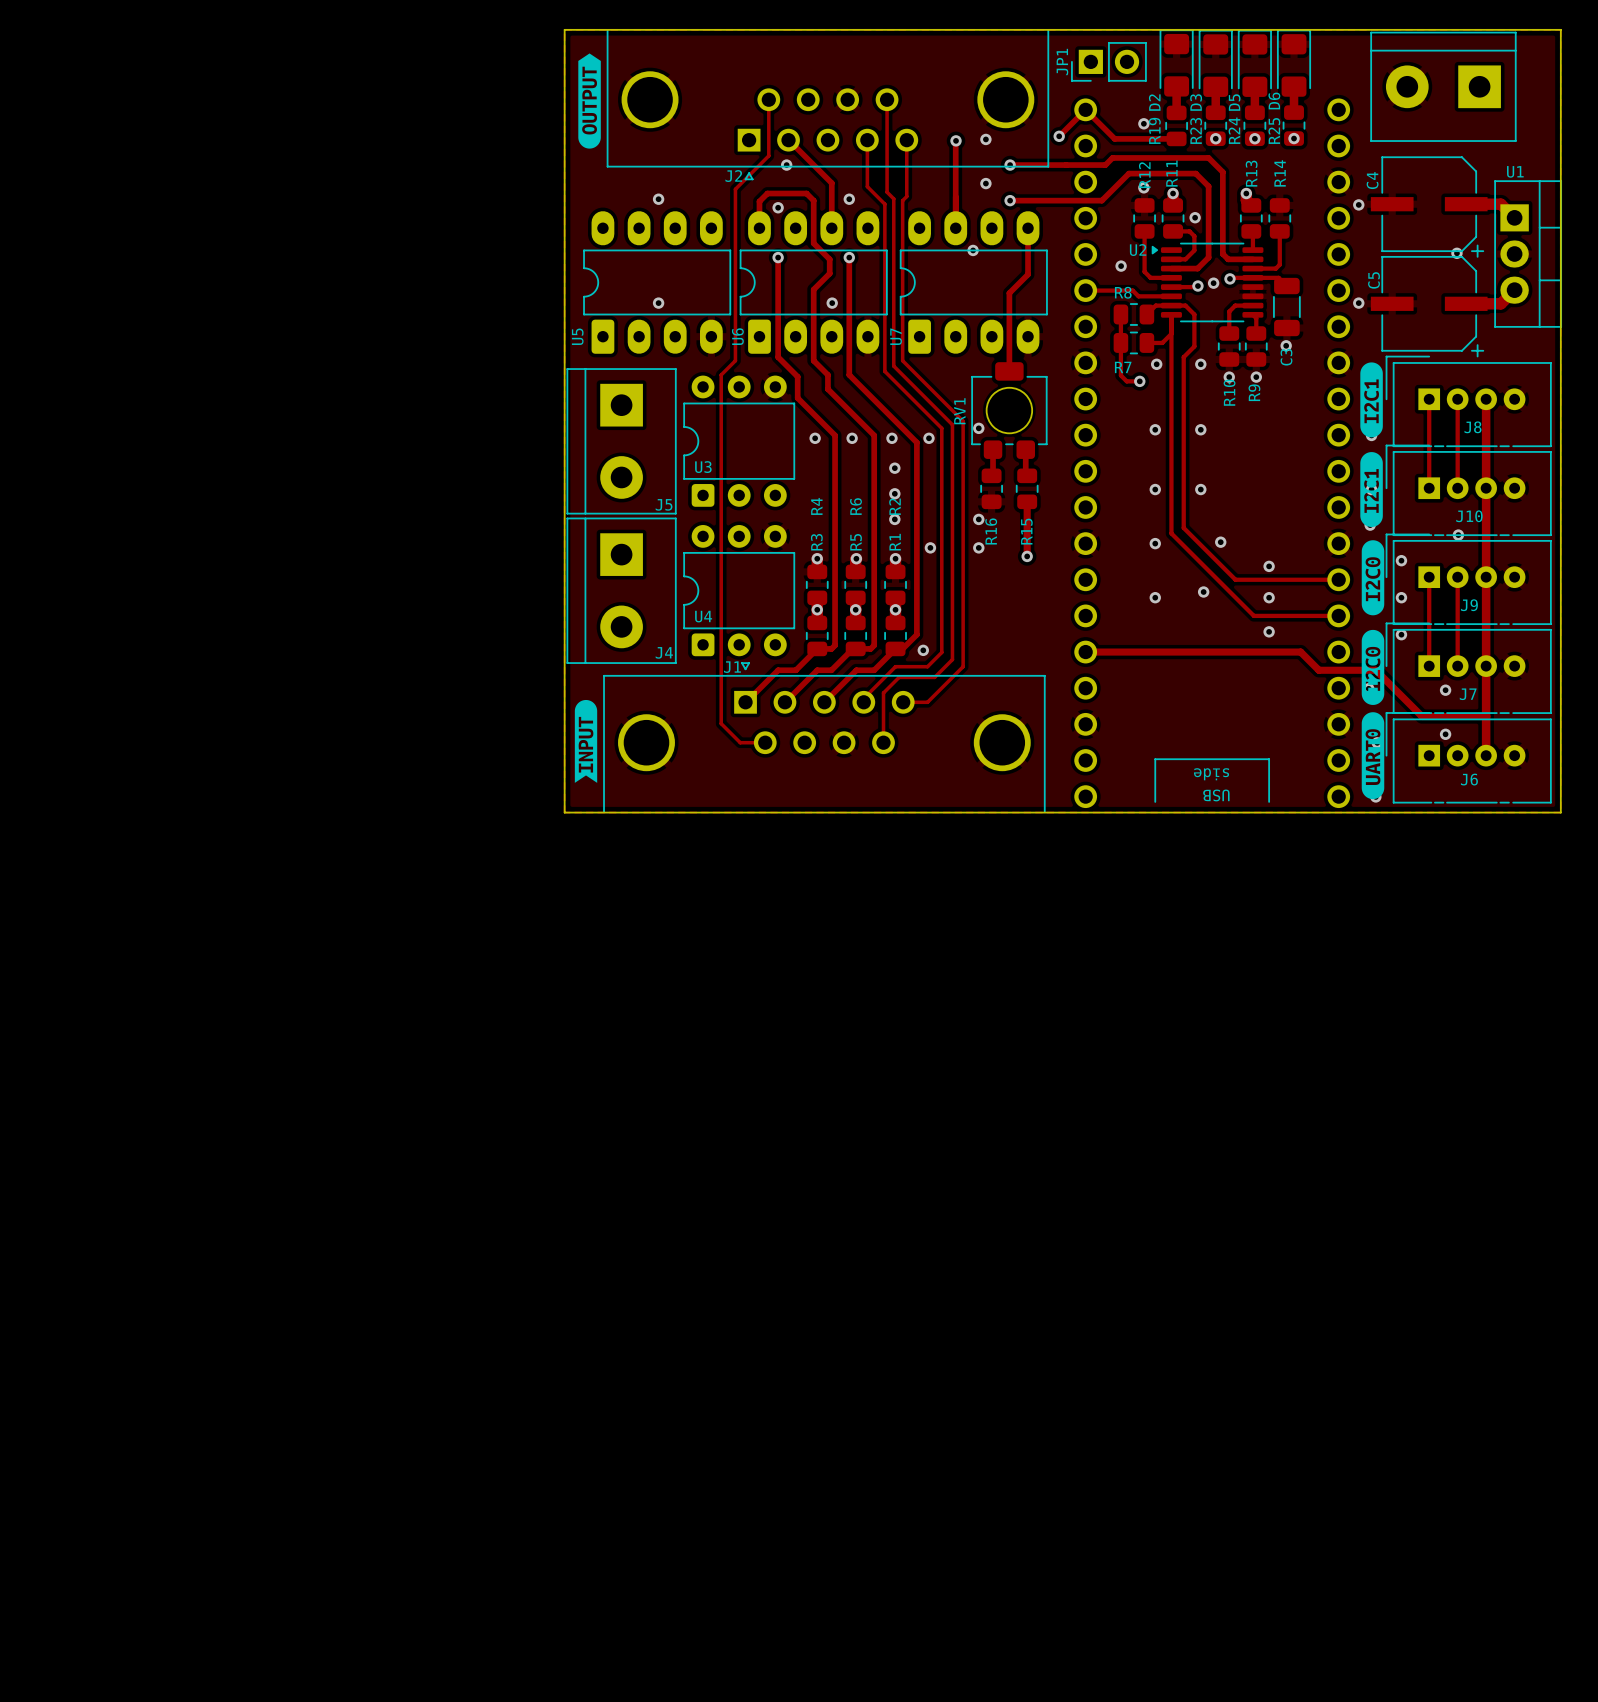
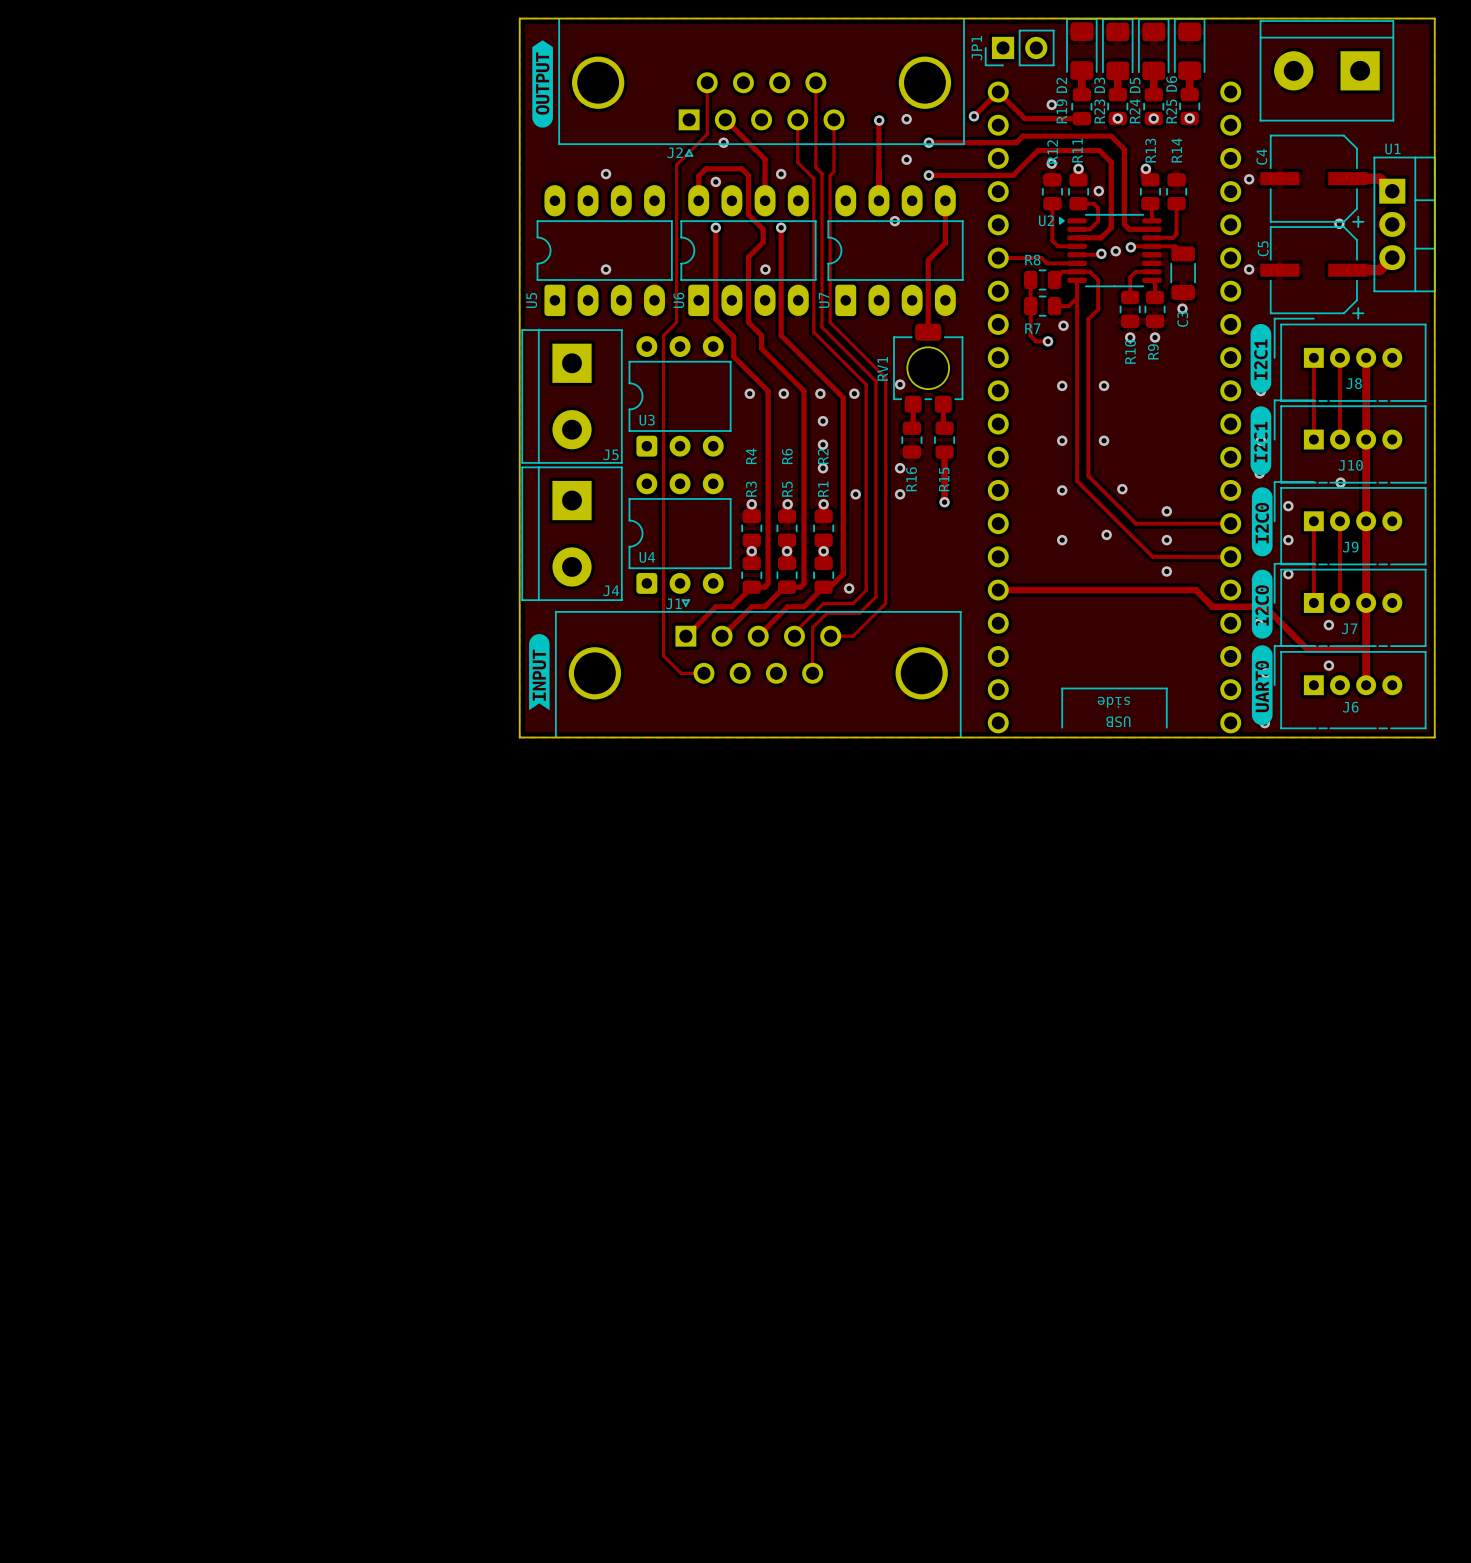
via: (1121, 266) -> none
via: (1200, 364) -> none

